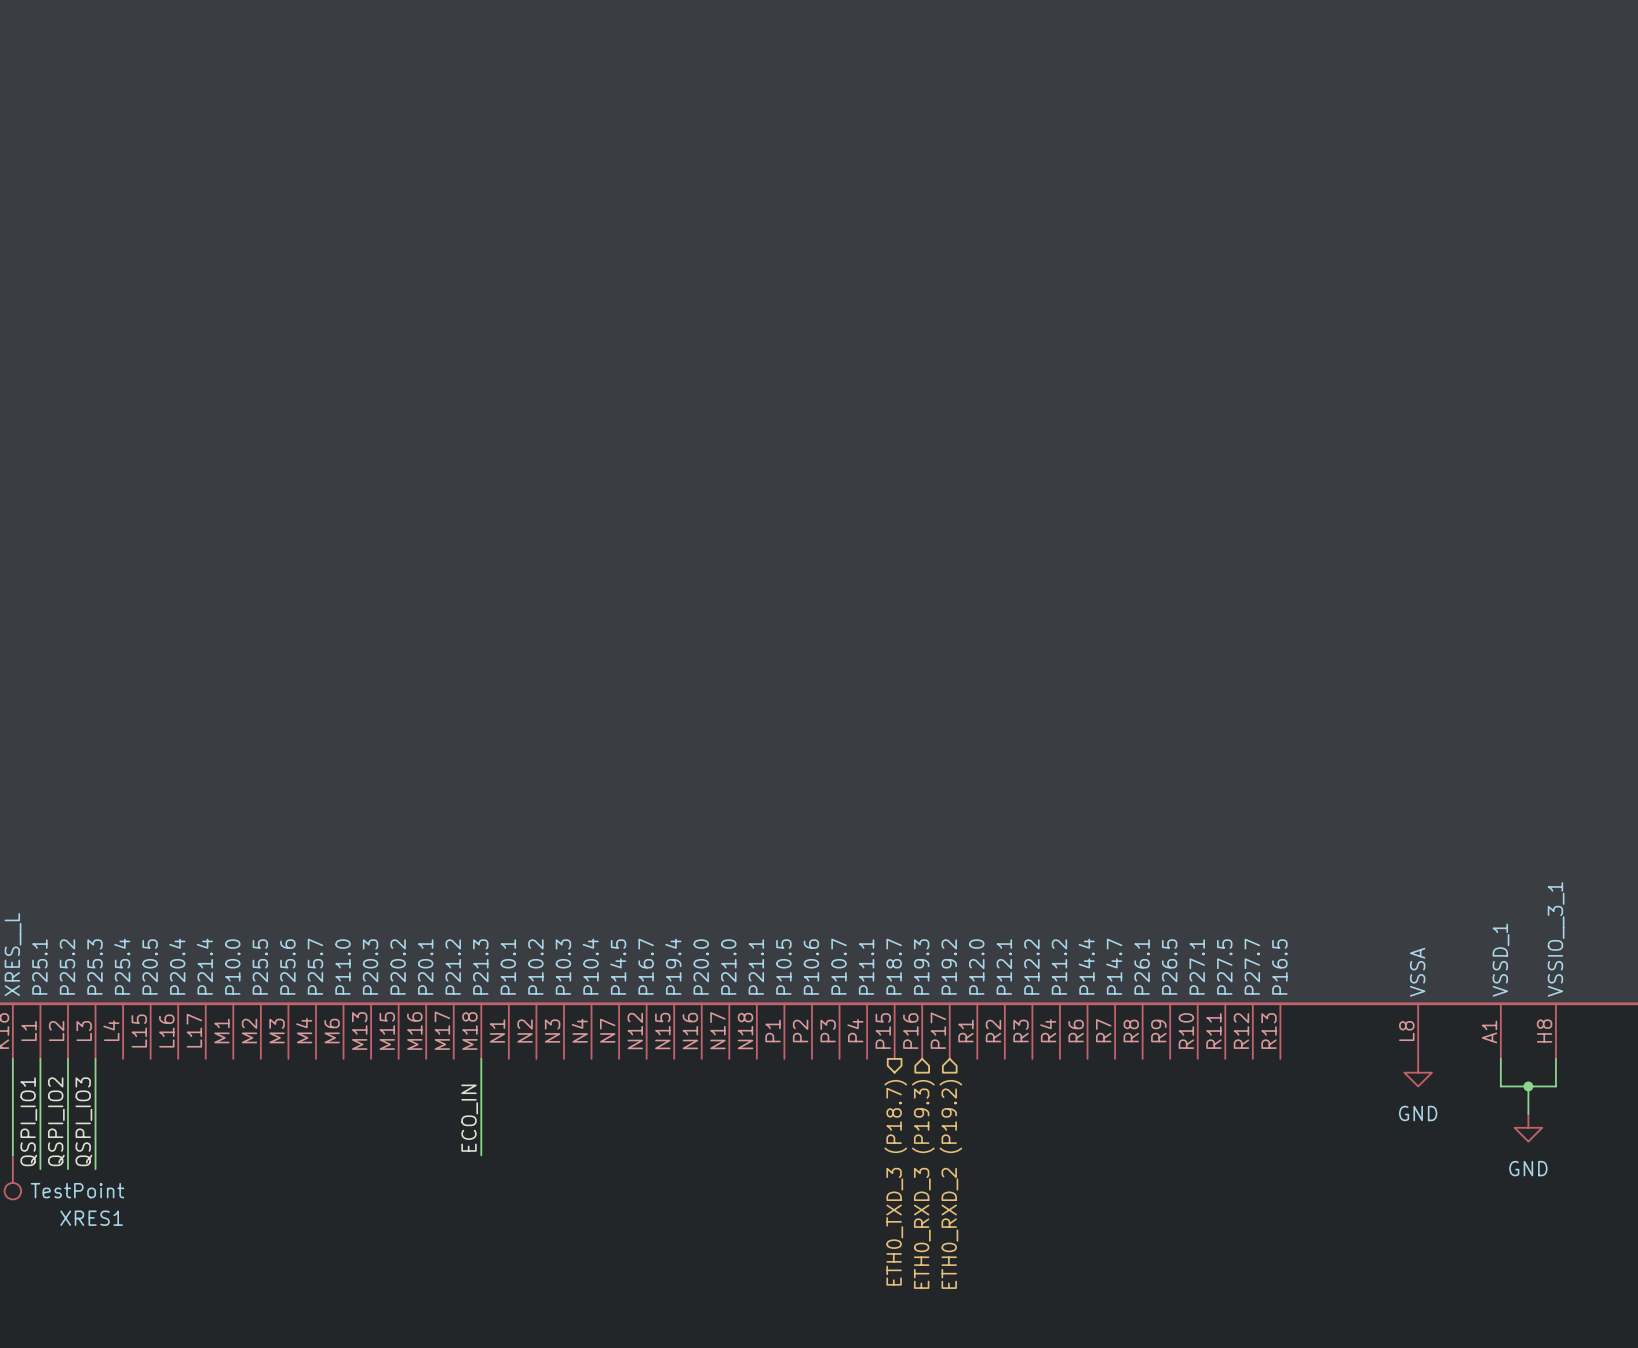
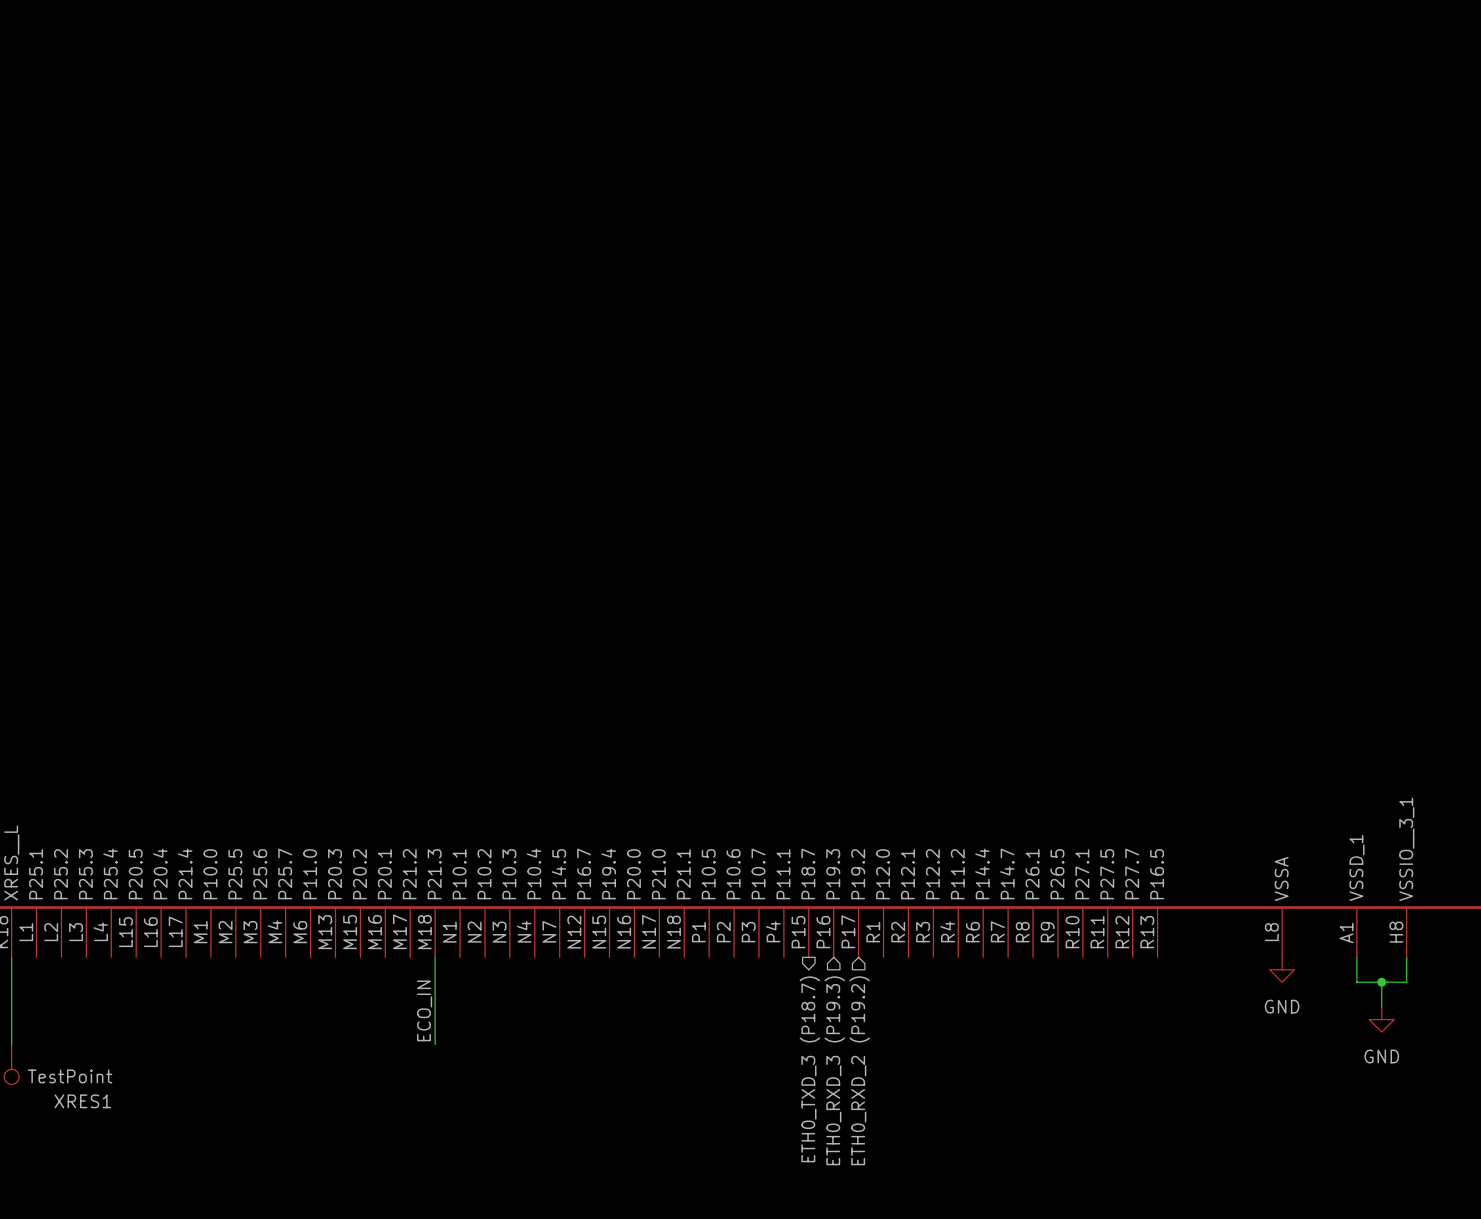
wire: (40, 1058) (40, 1169) -> none
wire: (67, 1058) (67, 1169) -> none
wire: (95, 1058) (95, 1169) -> none
label: QSPI_IO1 (28, 1121) -> none
label: QSPI_IO2 (56, 1121) -> none
label: QSPI_IO3 (83, 1121) -> none

